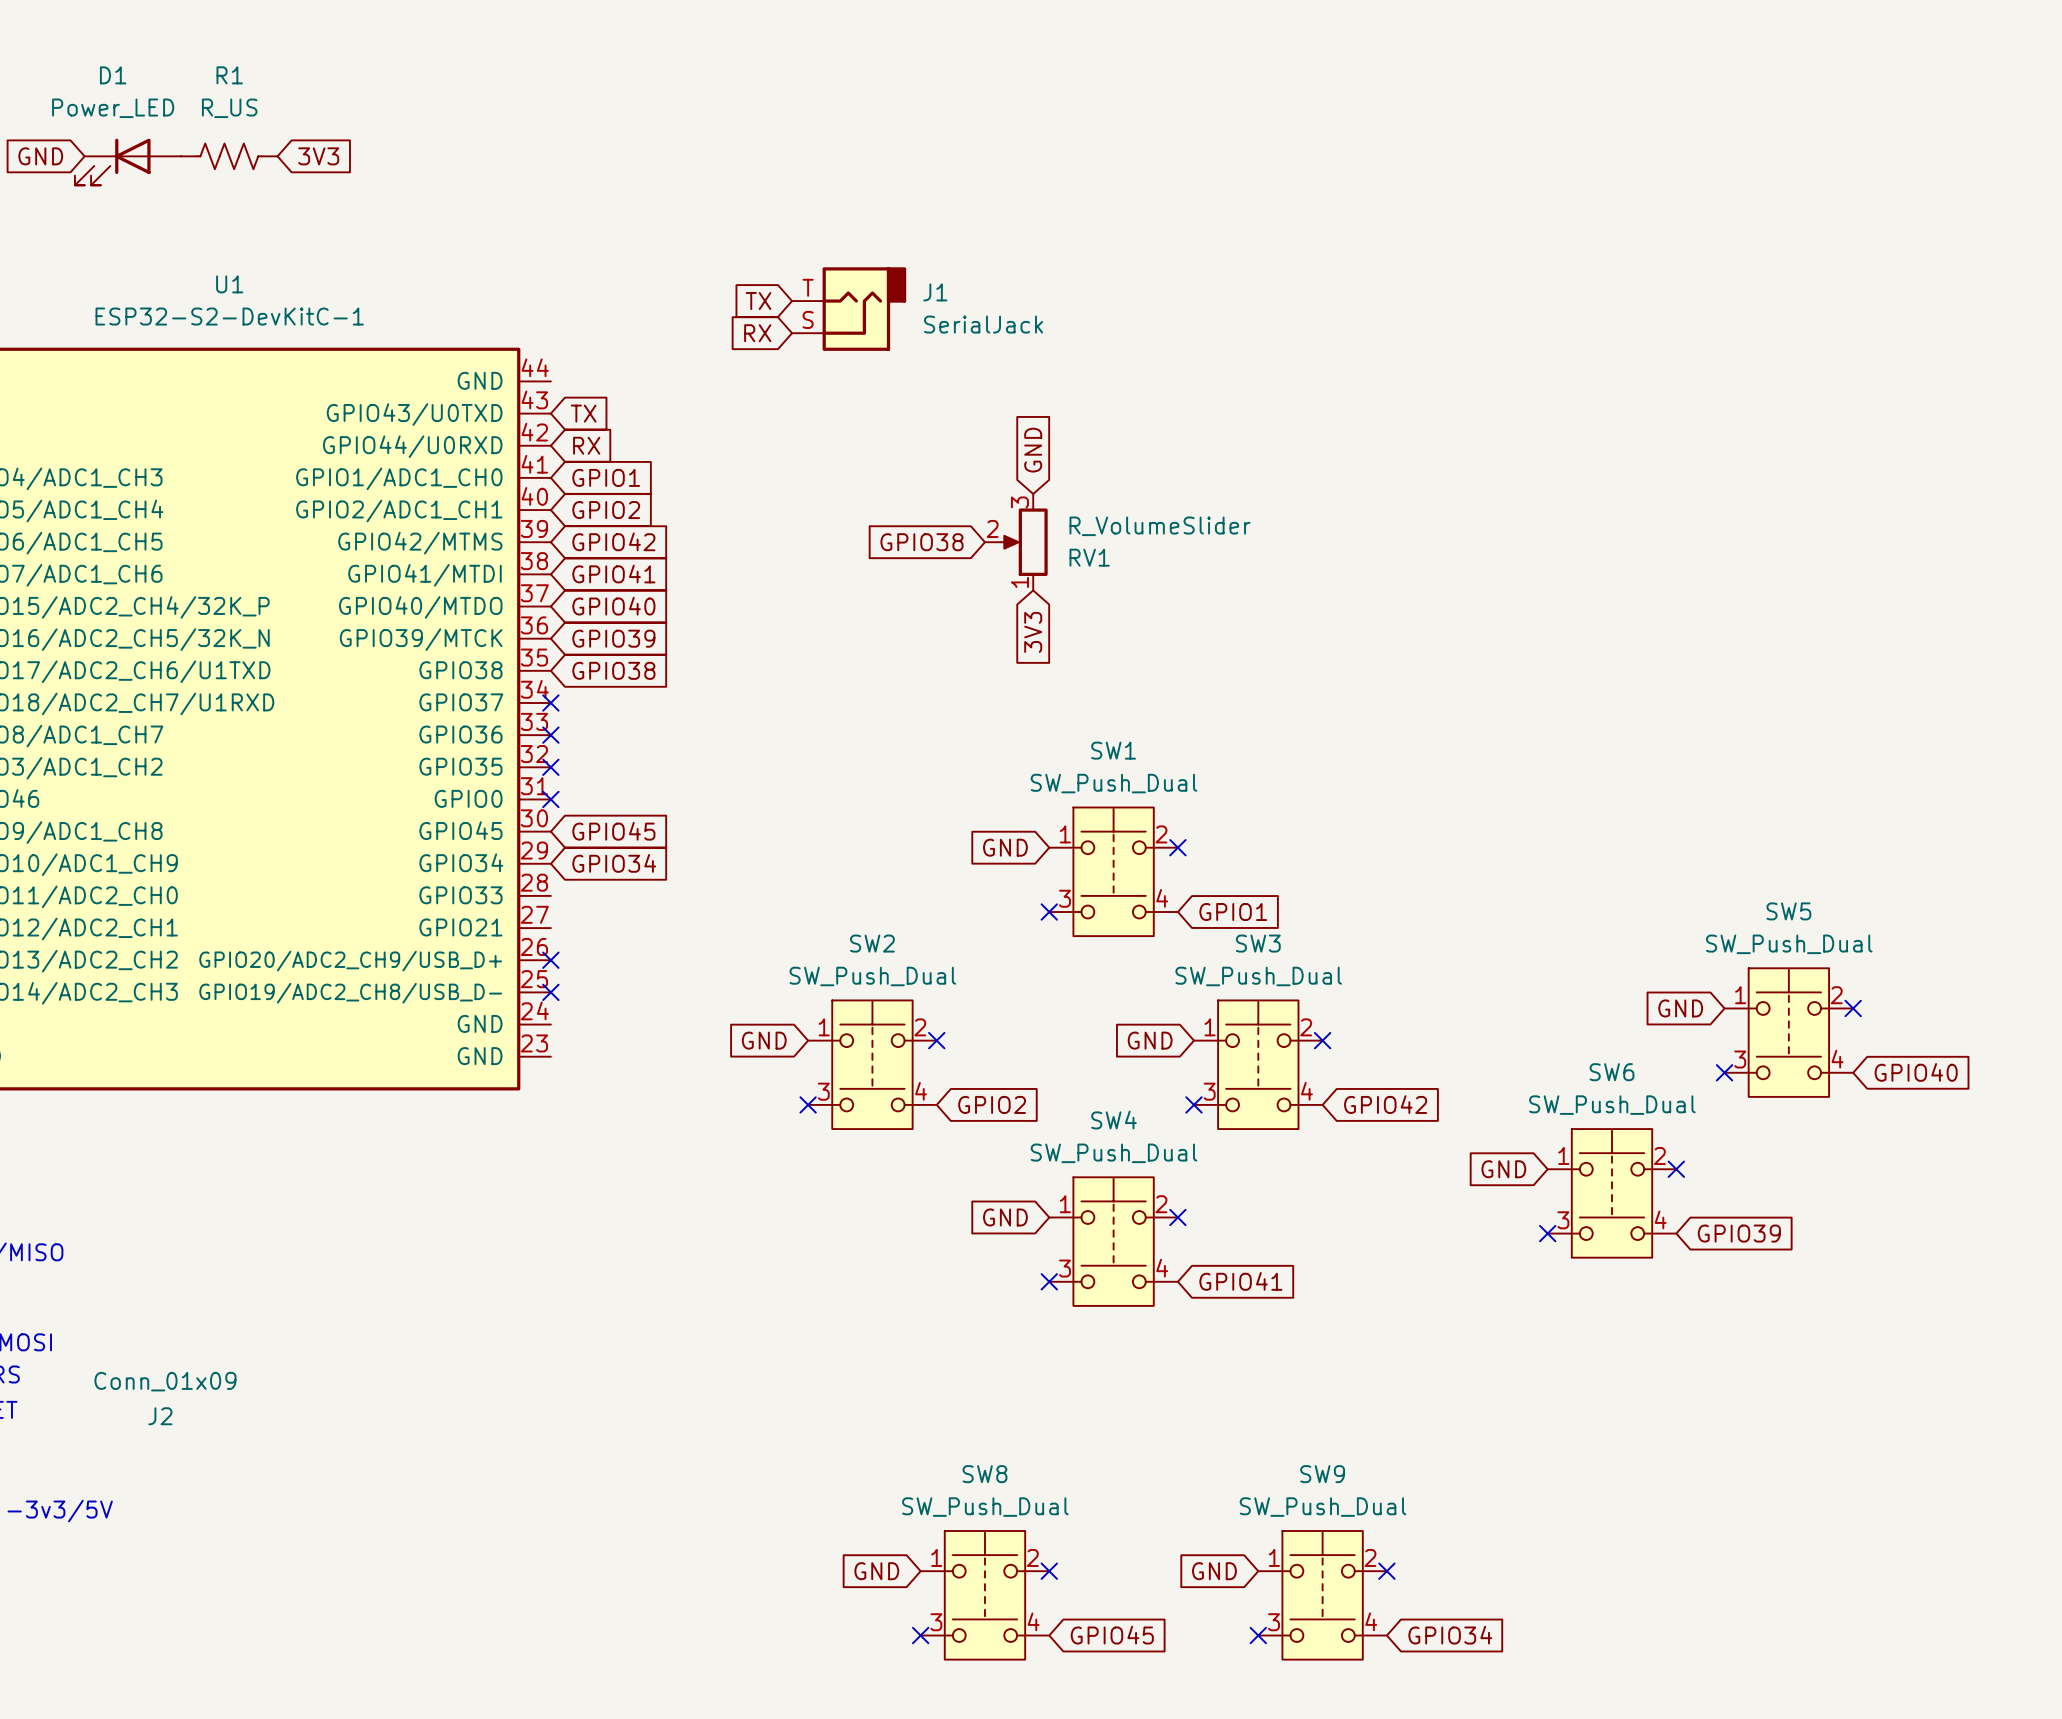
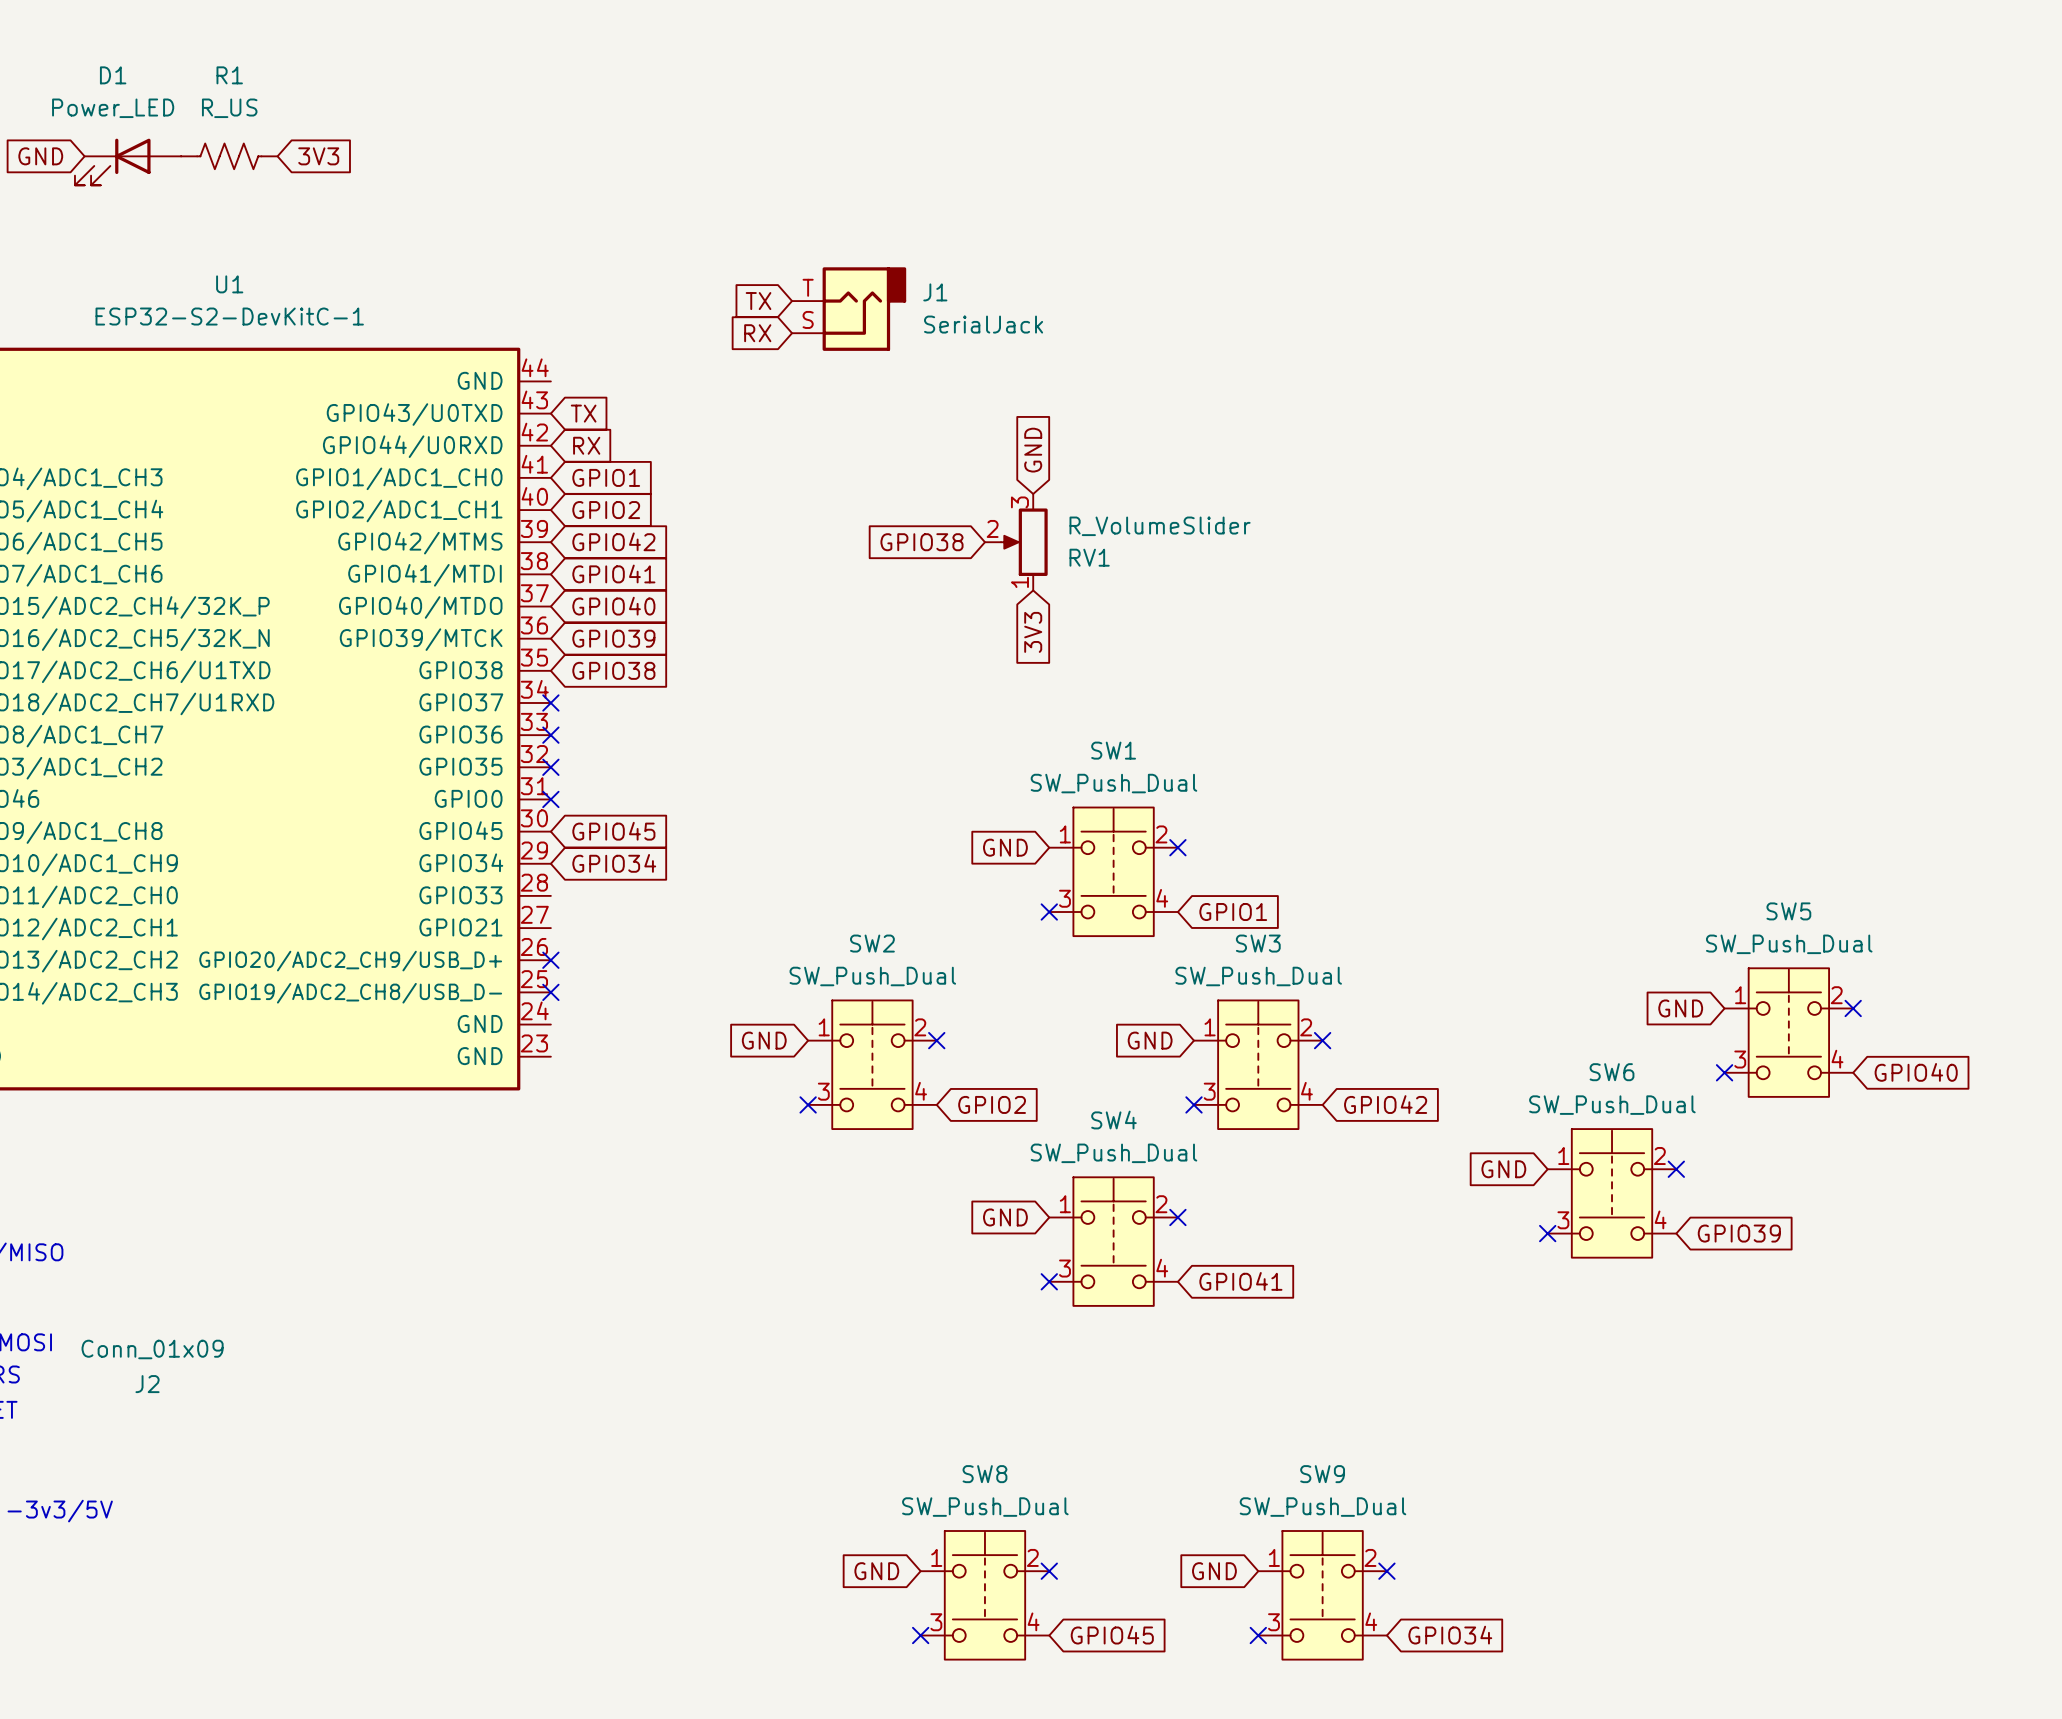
J2 value position: Conn_01x09 (165, 1381) -> Conn_01x09 (152, 1349)
J2 name position: J2 (160, 1416) -> J2 (147, 1384)

